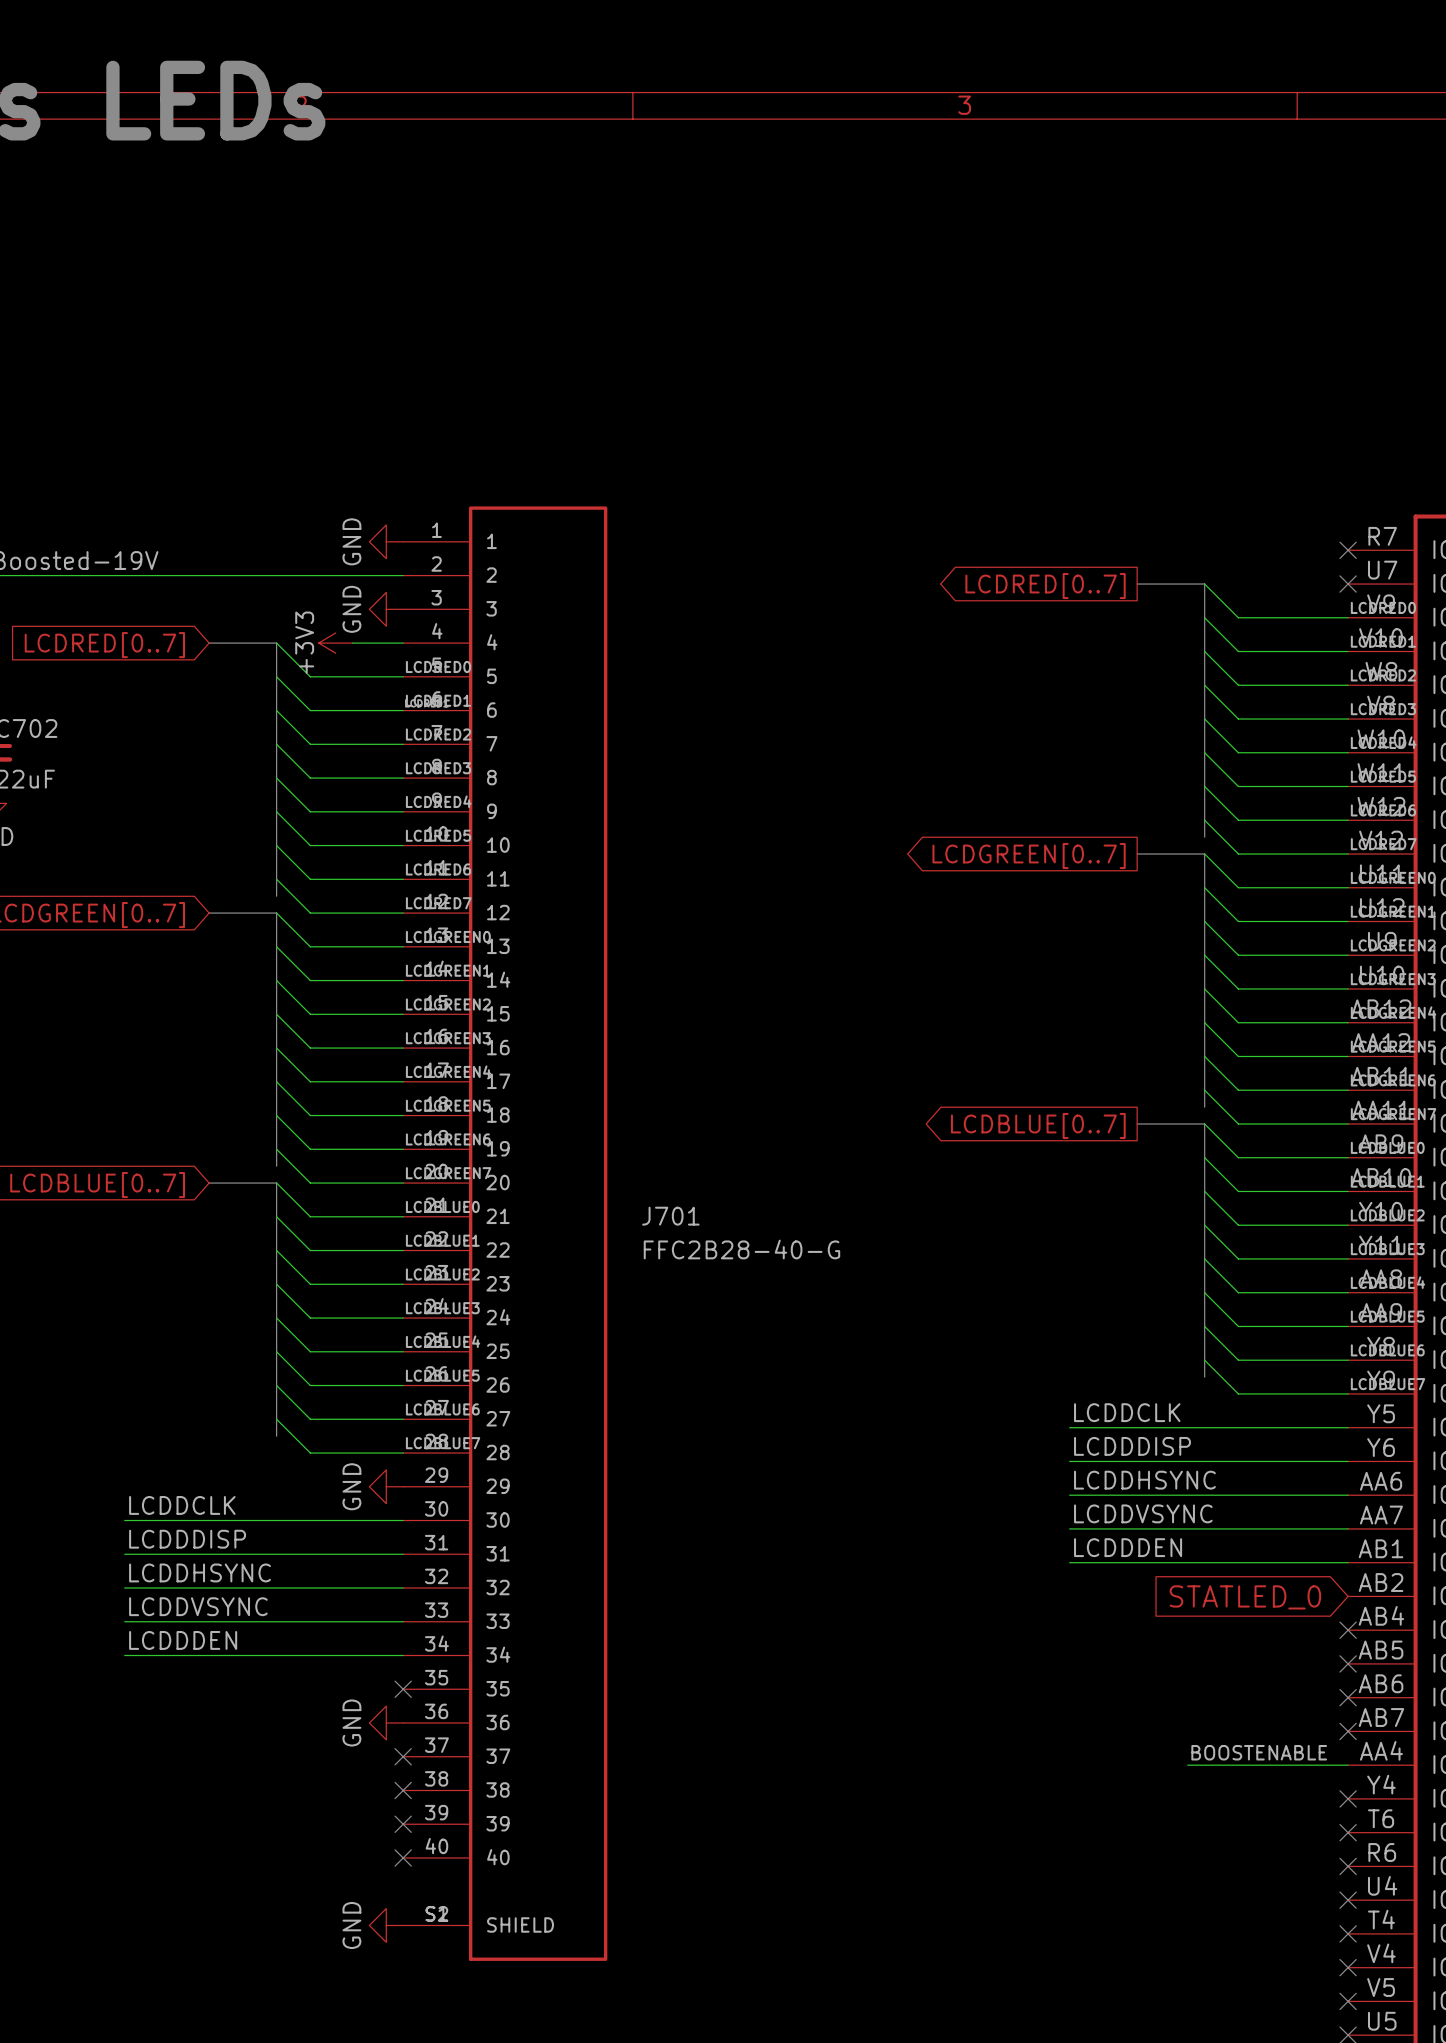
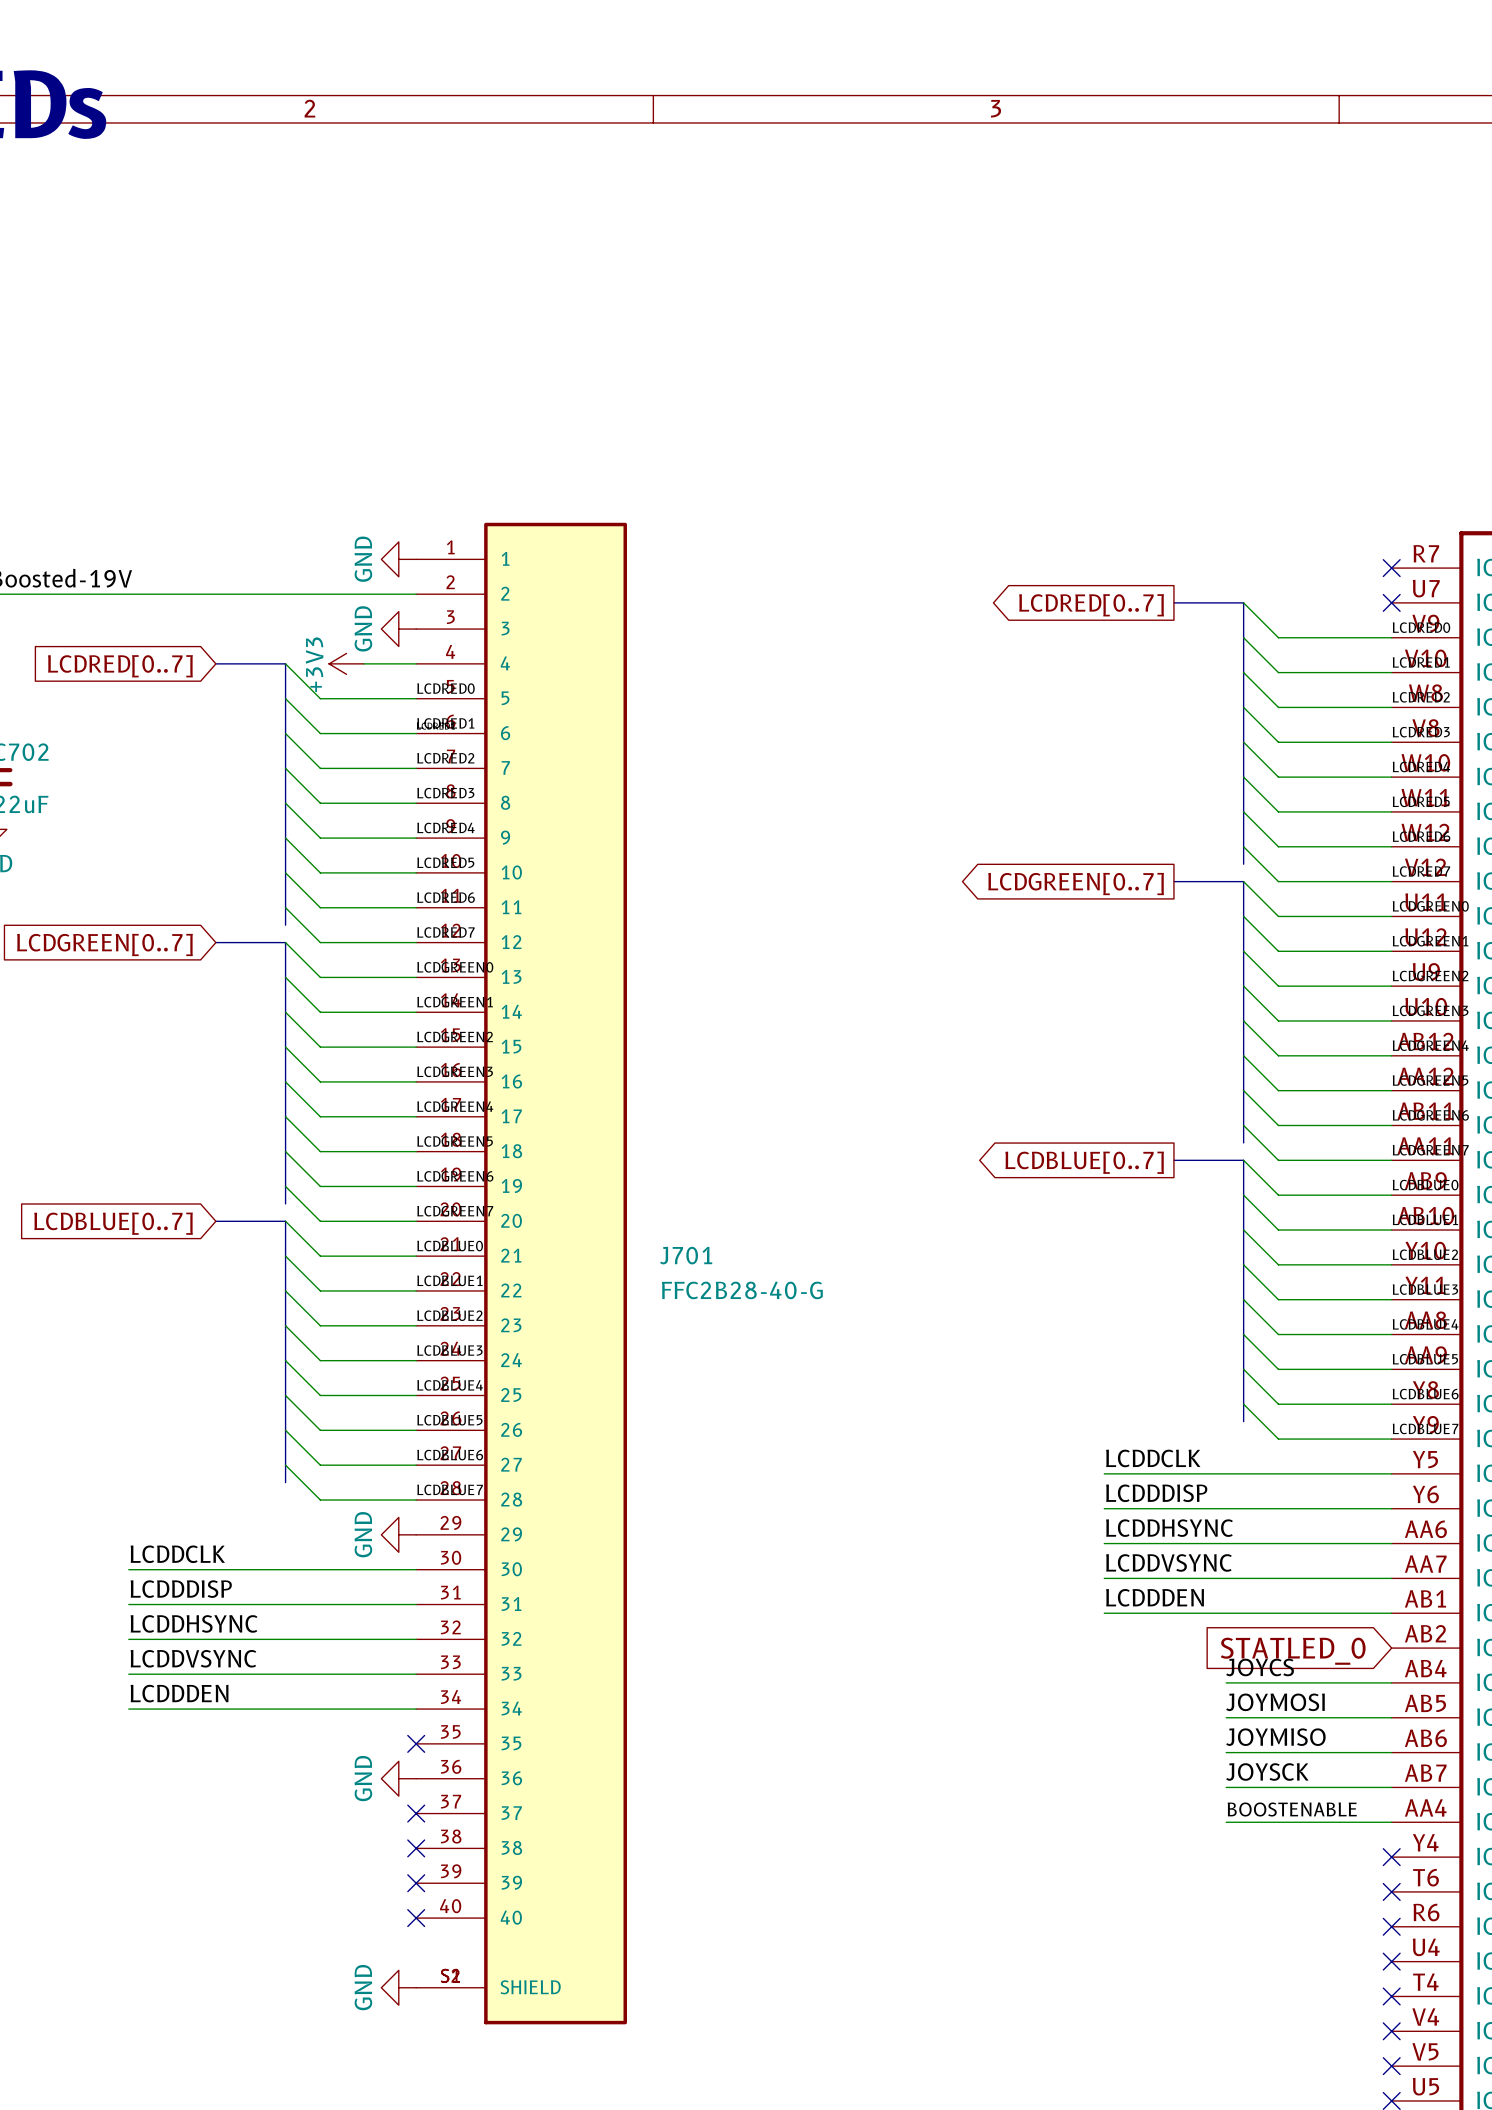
label: none -> JOYCS (1260, 1667)
wire: none -> (1226, 1682) (1391, 1682)
no-connect mark: (1348, 1630) -> none
label: none -> JOYMOSI (1275, 1702)
wire: none -> (1226, 1717) (1391, 1717)
no-connect mark: (1348, 1663) -> none
label: none -> JOYMISO (1275, 1737)
wire: none -> (1226, 1752) (1391, 1752)
no-connect mark: (1348, 1697) -> none
label: none -> JOYSCK (1267, 1771)
wire: none -> (1226, 1787) (1391, 1787)
no-connect mark: (1348, 1731) -> none

